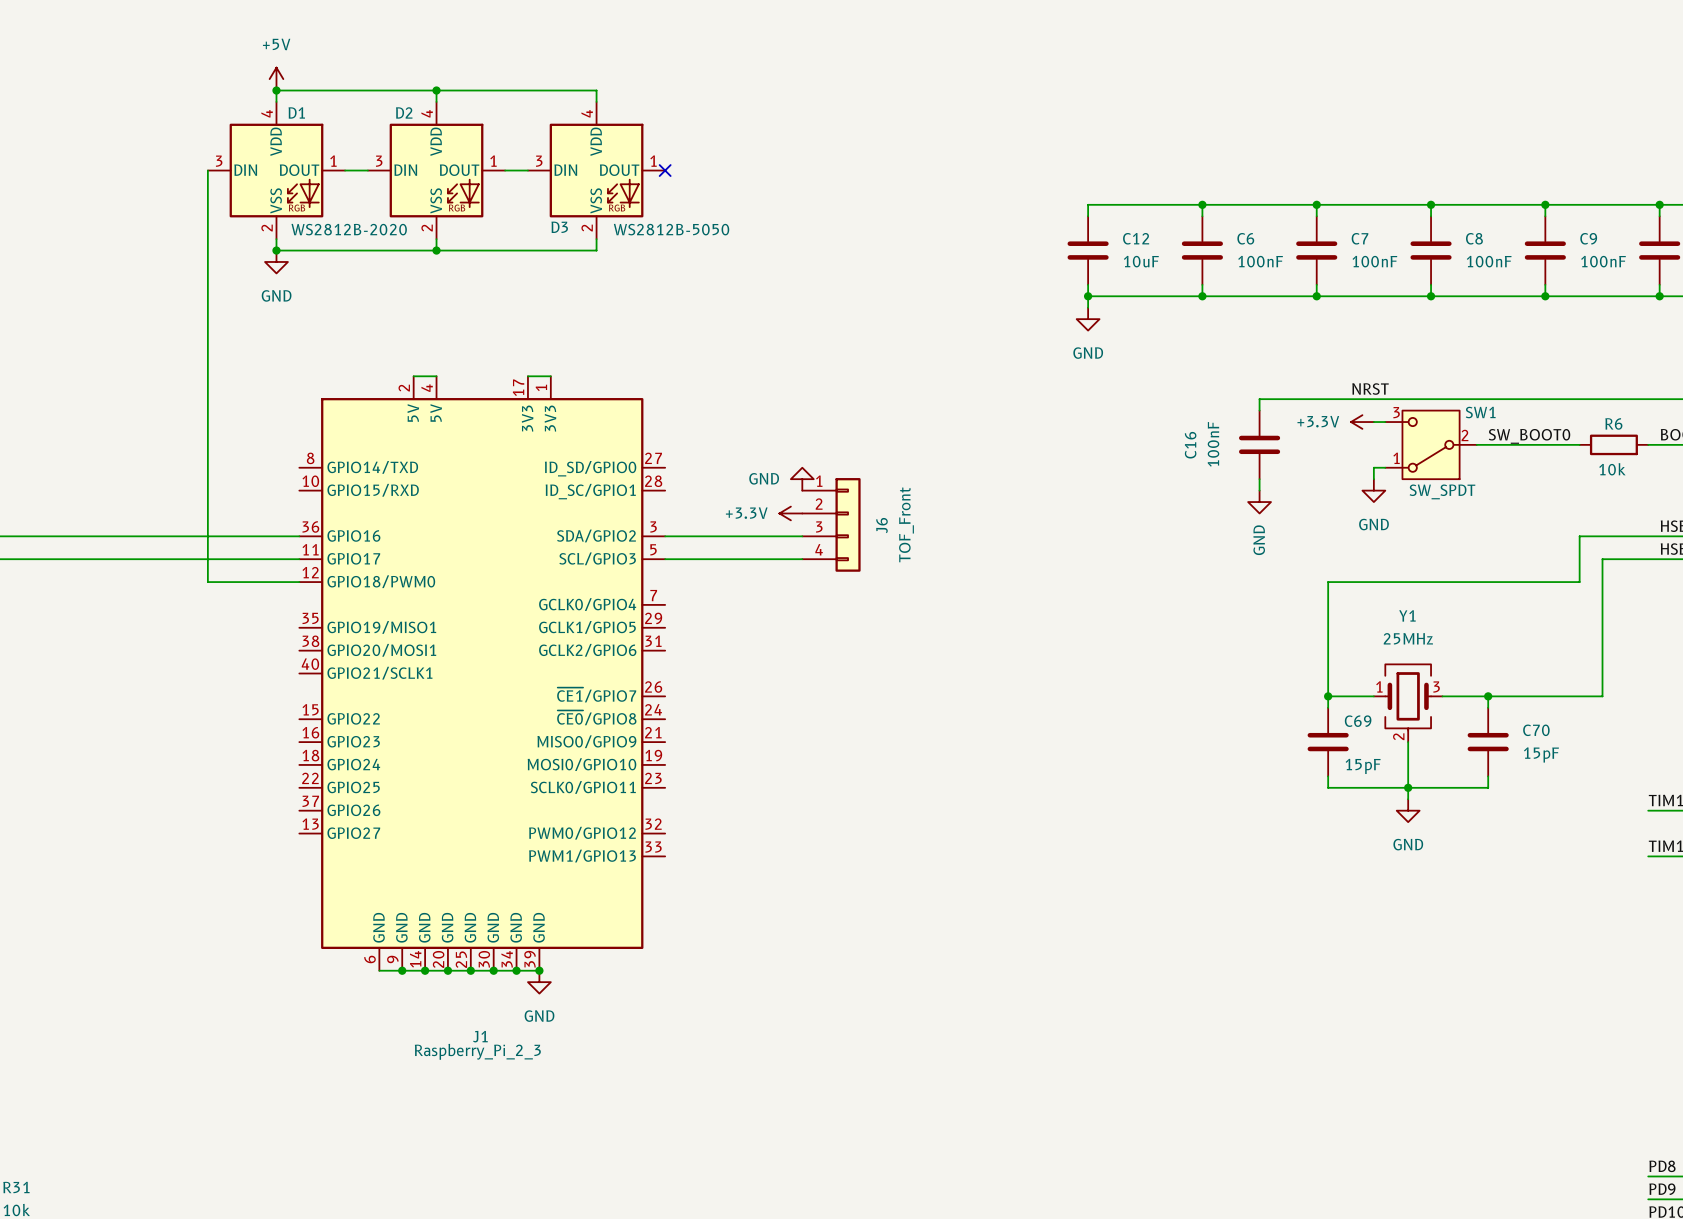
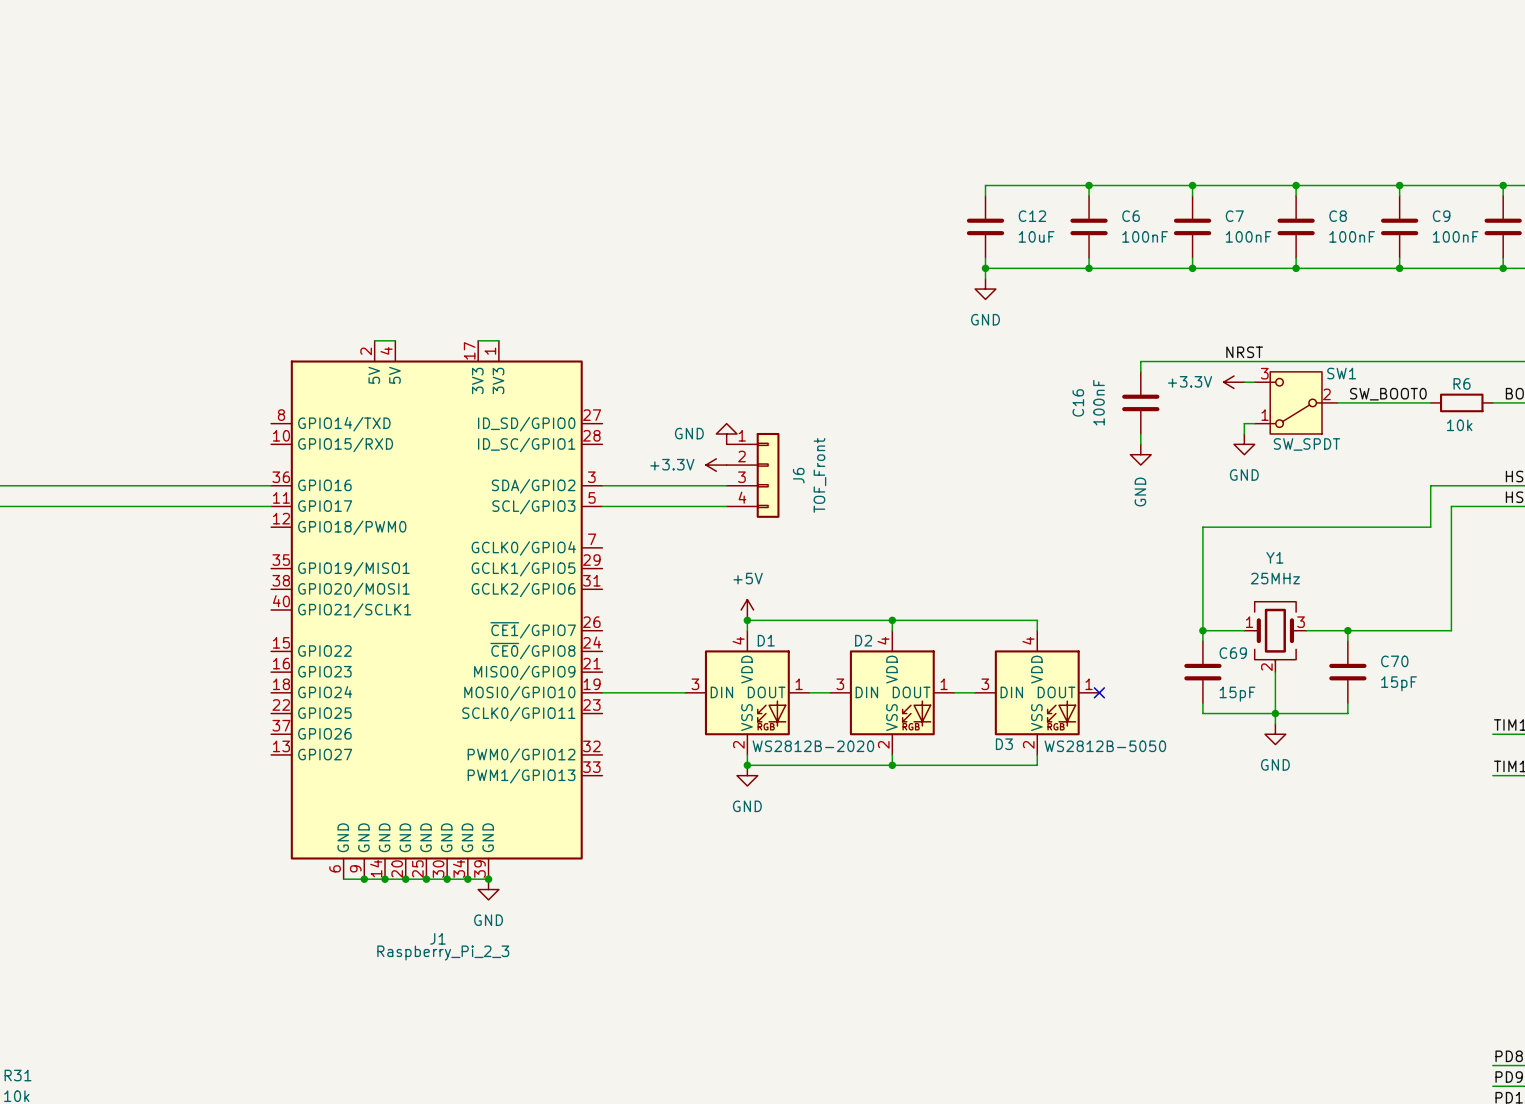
power symbol: +5V (276, 79) -> none
junction: (276, 90) -> none
wire: (436, 90) (436, 101) -> none
junction: (436, 90) -> none
wire: (276, 101) (276, 90) (596, 90) (596, 101) -> none
wire: (207, 170) (207, 582) (299, 582) -> none
D1 position: (276, 170) -> (747, 692)
wire: (345, 170) (367, 170) -> none
D2 position: (436, 170) -> (892, 692)
wire: (505, 170) (527, 170) -> none
D3 position: (596, 170) -> (1037, 692)
no-connect mark: (665, 170) -> none
wire: (276, 239) (276, 250) (596, 250) (596, 239) -> none
wire: (436, 239) (436, 250) -> none
junction: (276, 250) -> none
junction: (436, 250) -> none
power symbol: GND (276, 261) -> none
power symbol: none -> +5V (747, 610)
junction: none -> (747, 620)
wire: none -> (892, 620) (892, 630)
junction: none -> (892, 620)
wire: none -> (747, 630) (747, 620) (1037, 620) (1037, 630)
wire: none -> (602, 692) (685, 692)
wire: none -> (809, 692) (830, 692)
wire: none -> (954, 692) (975, 692)
no-connect mark: none -> (1099, 692)
wire: none -> (747, 754) (747, 765) (1037, 765) (1037, 754)
wire: none -> (892, 754) (892, 765)
junction: none -> (747, 765)
junction: none -> (892, 765)
power symbol: none -> GND (747, 775)

